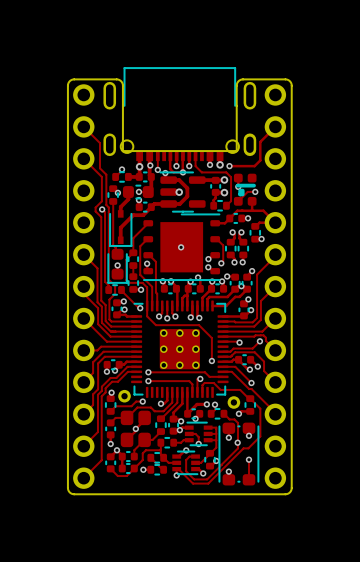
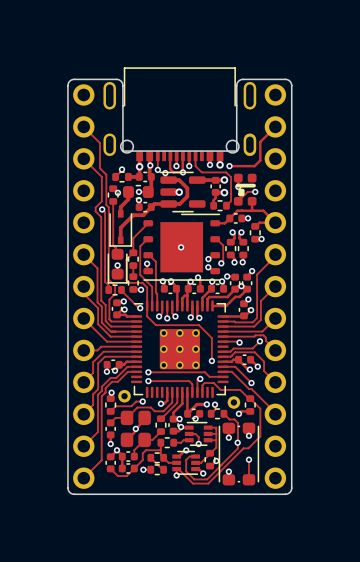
via: none -> (179, 418)
via: (181, 421) -> none
via: none -> (181, 427)
via: (179, 430) -> none

